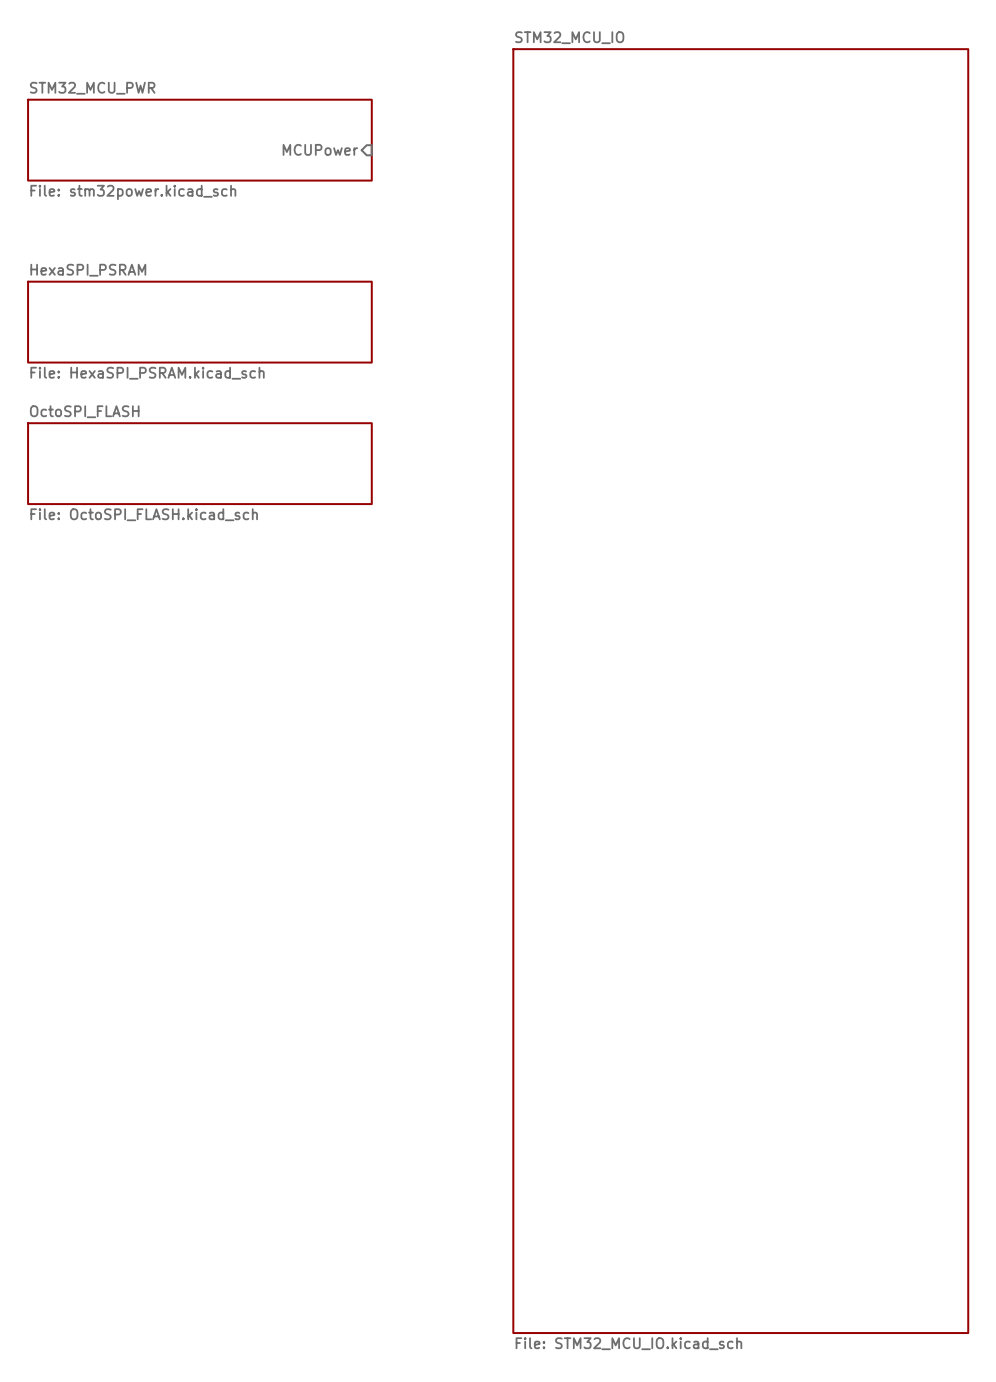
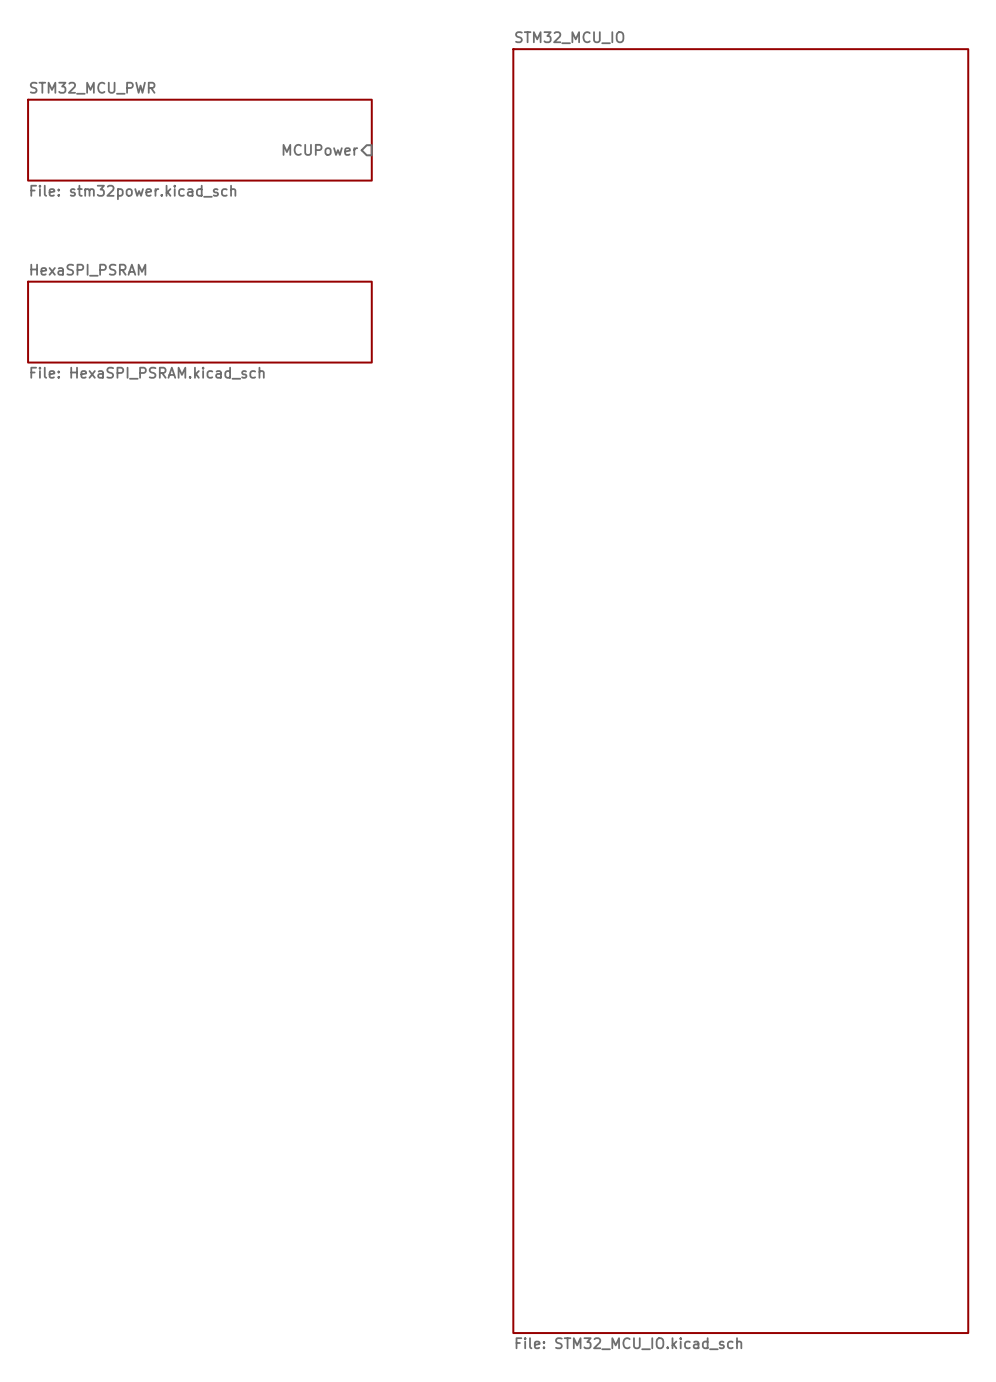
sheet OctoSPI_FLASH: File: OctoSPI_FLASH.kicad_sch (199, 463) -> none

